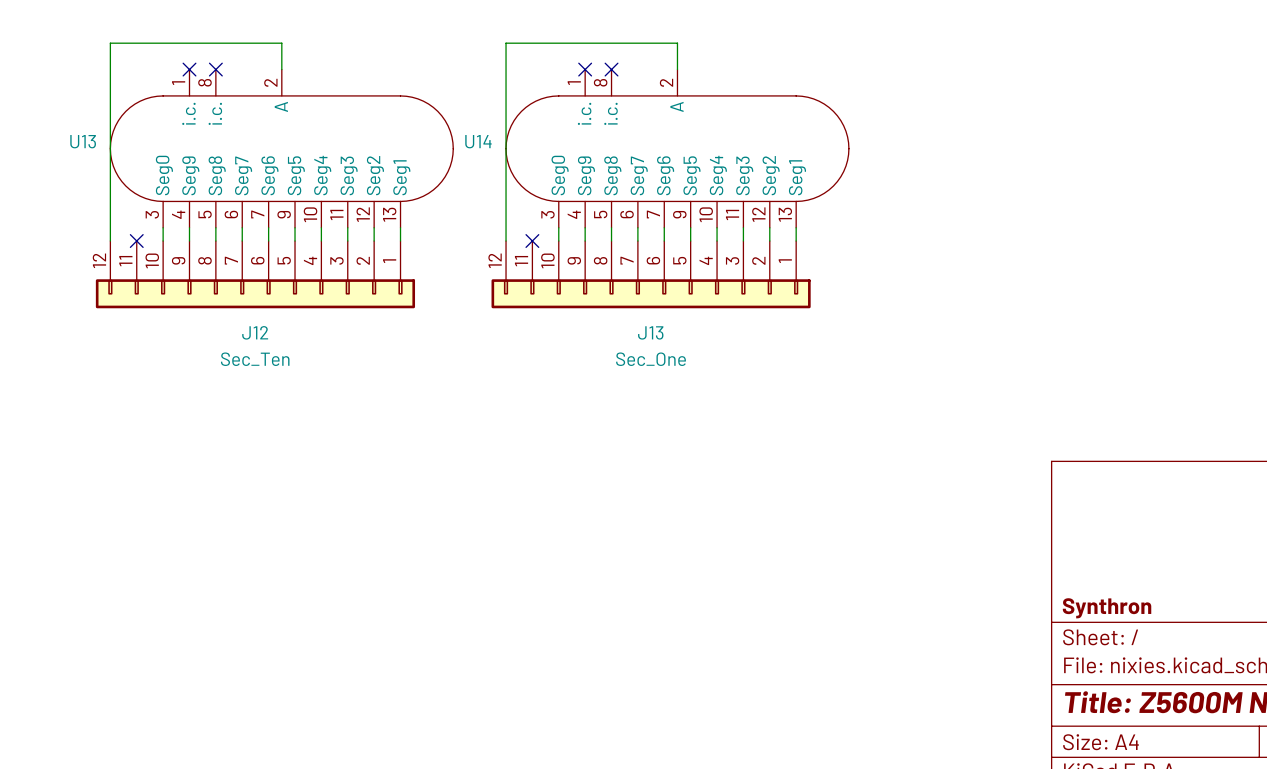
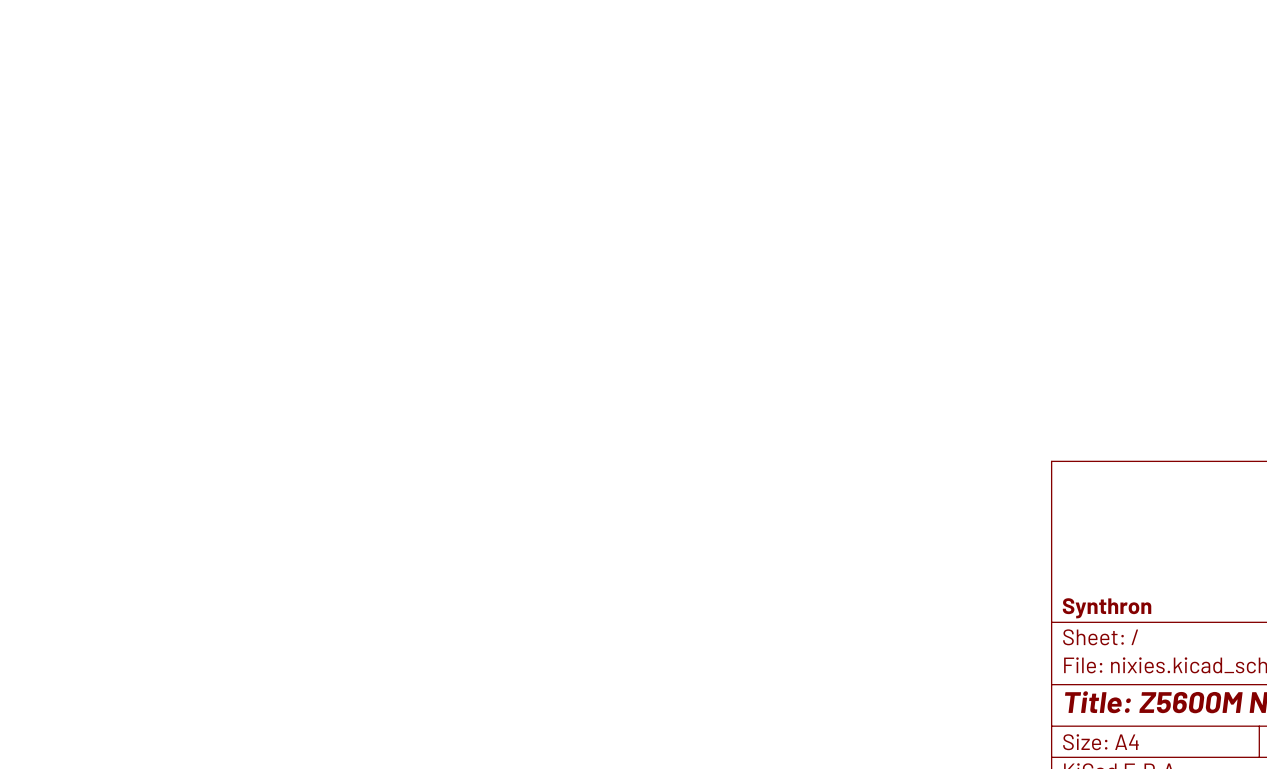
no-connect mark: (189, 69) -> none
no-connect mark: (215, 69) -> none
wire: (281, 69) (281, 43) (110, 43) (110, 241) -> none
no-connect mark: (585, 69) -> none
no-connect mark: (611, 69) -> none
wire: (677, 69) (677, 43) (506, 43) (506, 241) -> none
U13: (281, 148) -> none
U14: (677, 148) -> none
wire: (163, 227) (163, 241) -> none
wire: (189, 227) (189, 241) -> none
wire: (215, 227) (215, 241) -> none
wire: (242, 227) (242, 241) -> none
wire: (268, 227) (268, 241) -> none
wire: (295, 227) (295, 241) -> none
wire: (321, 227) (321, 241) -> none
wire: (347, 227) (347, 241) -> none
wire: (374, 227) (374, 241) -> none
wire: (400, 227) (400, 241) -> none
wire: (558, 227) (558, 241) -> none
wire: (585, 227) (585, 241) -> none
wire: (611, 227) (611, 241) -> none
wire: (637, 227) (637, 241) -> none
wire: (664, 227) (664, 241) -> none
wire: (690, 227) (690, 241) -> none
wire: (717, 227) (717, 241) -> none
wire: (743, 227) (743, 241) -> none
wire: (769, 227) (769, 241) -> none
wire: (796, 227) (796, 241) -> none
no-connect mark: (136, 241) -> none
no-connect mark: (532, 241) -> none
J12: Sec_Ten (255, 274) -> none
J13: Sec_One (651, 274) -> none

